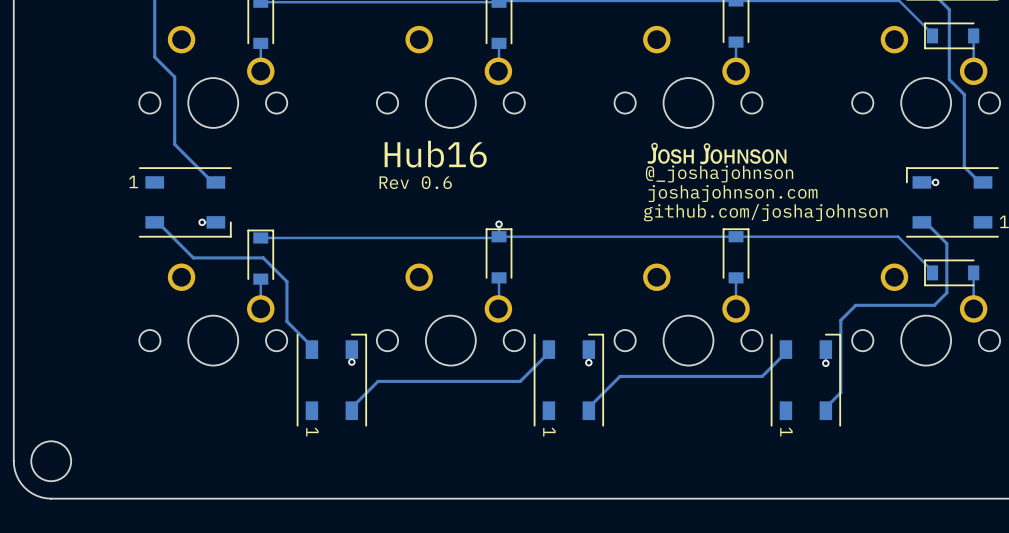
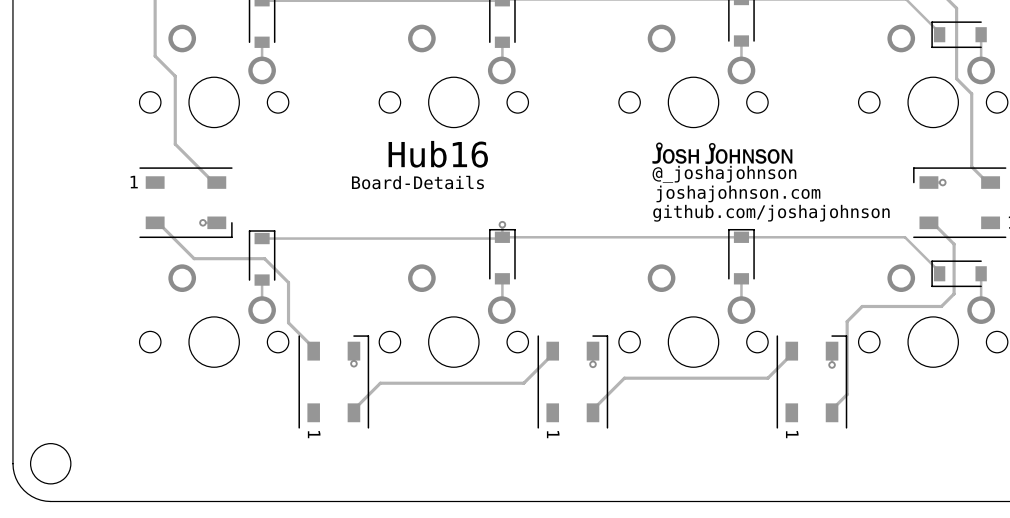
drawing: none -> [351, 140, 488, 190]
drawing: [379, 140, 487, 190] -> none

